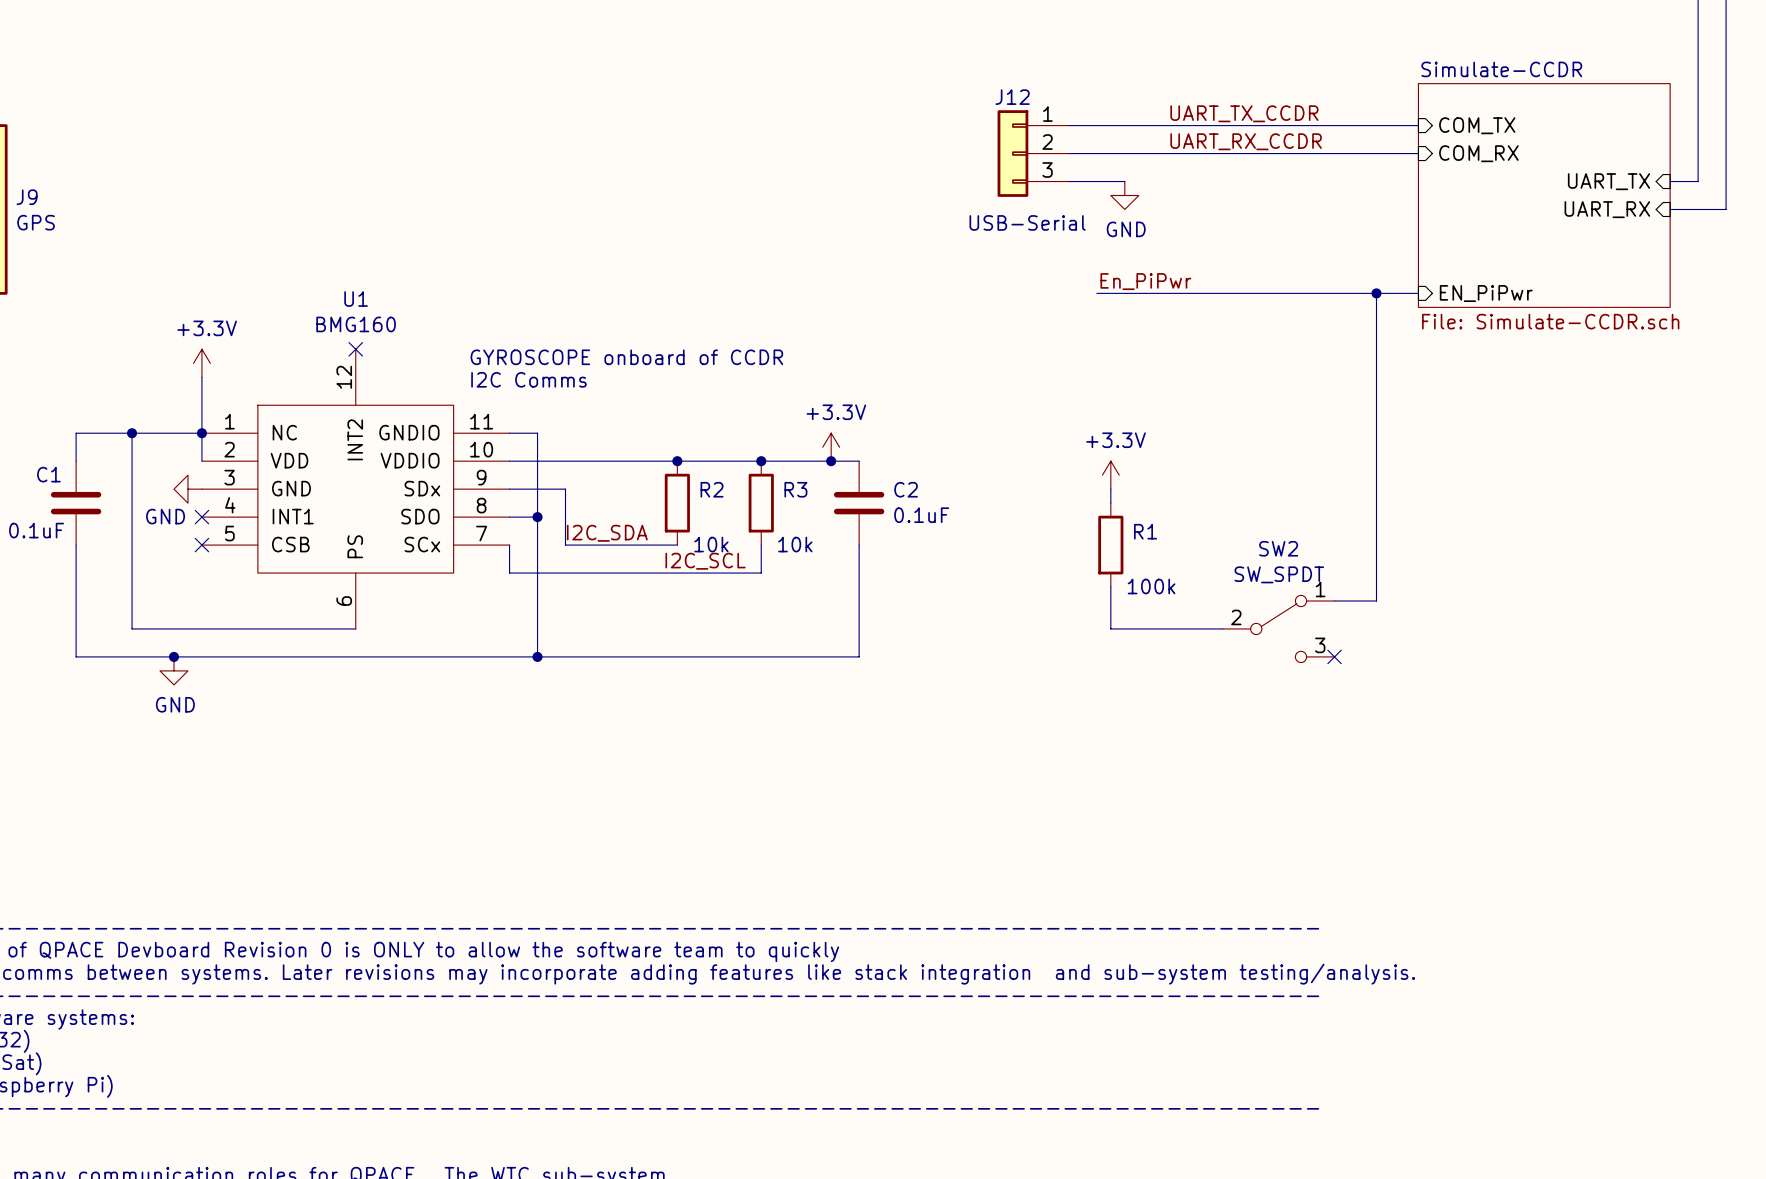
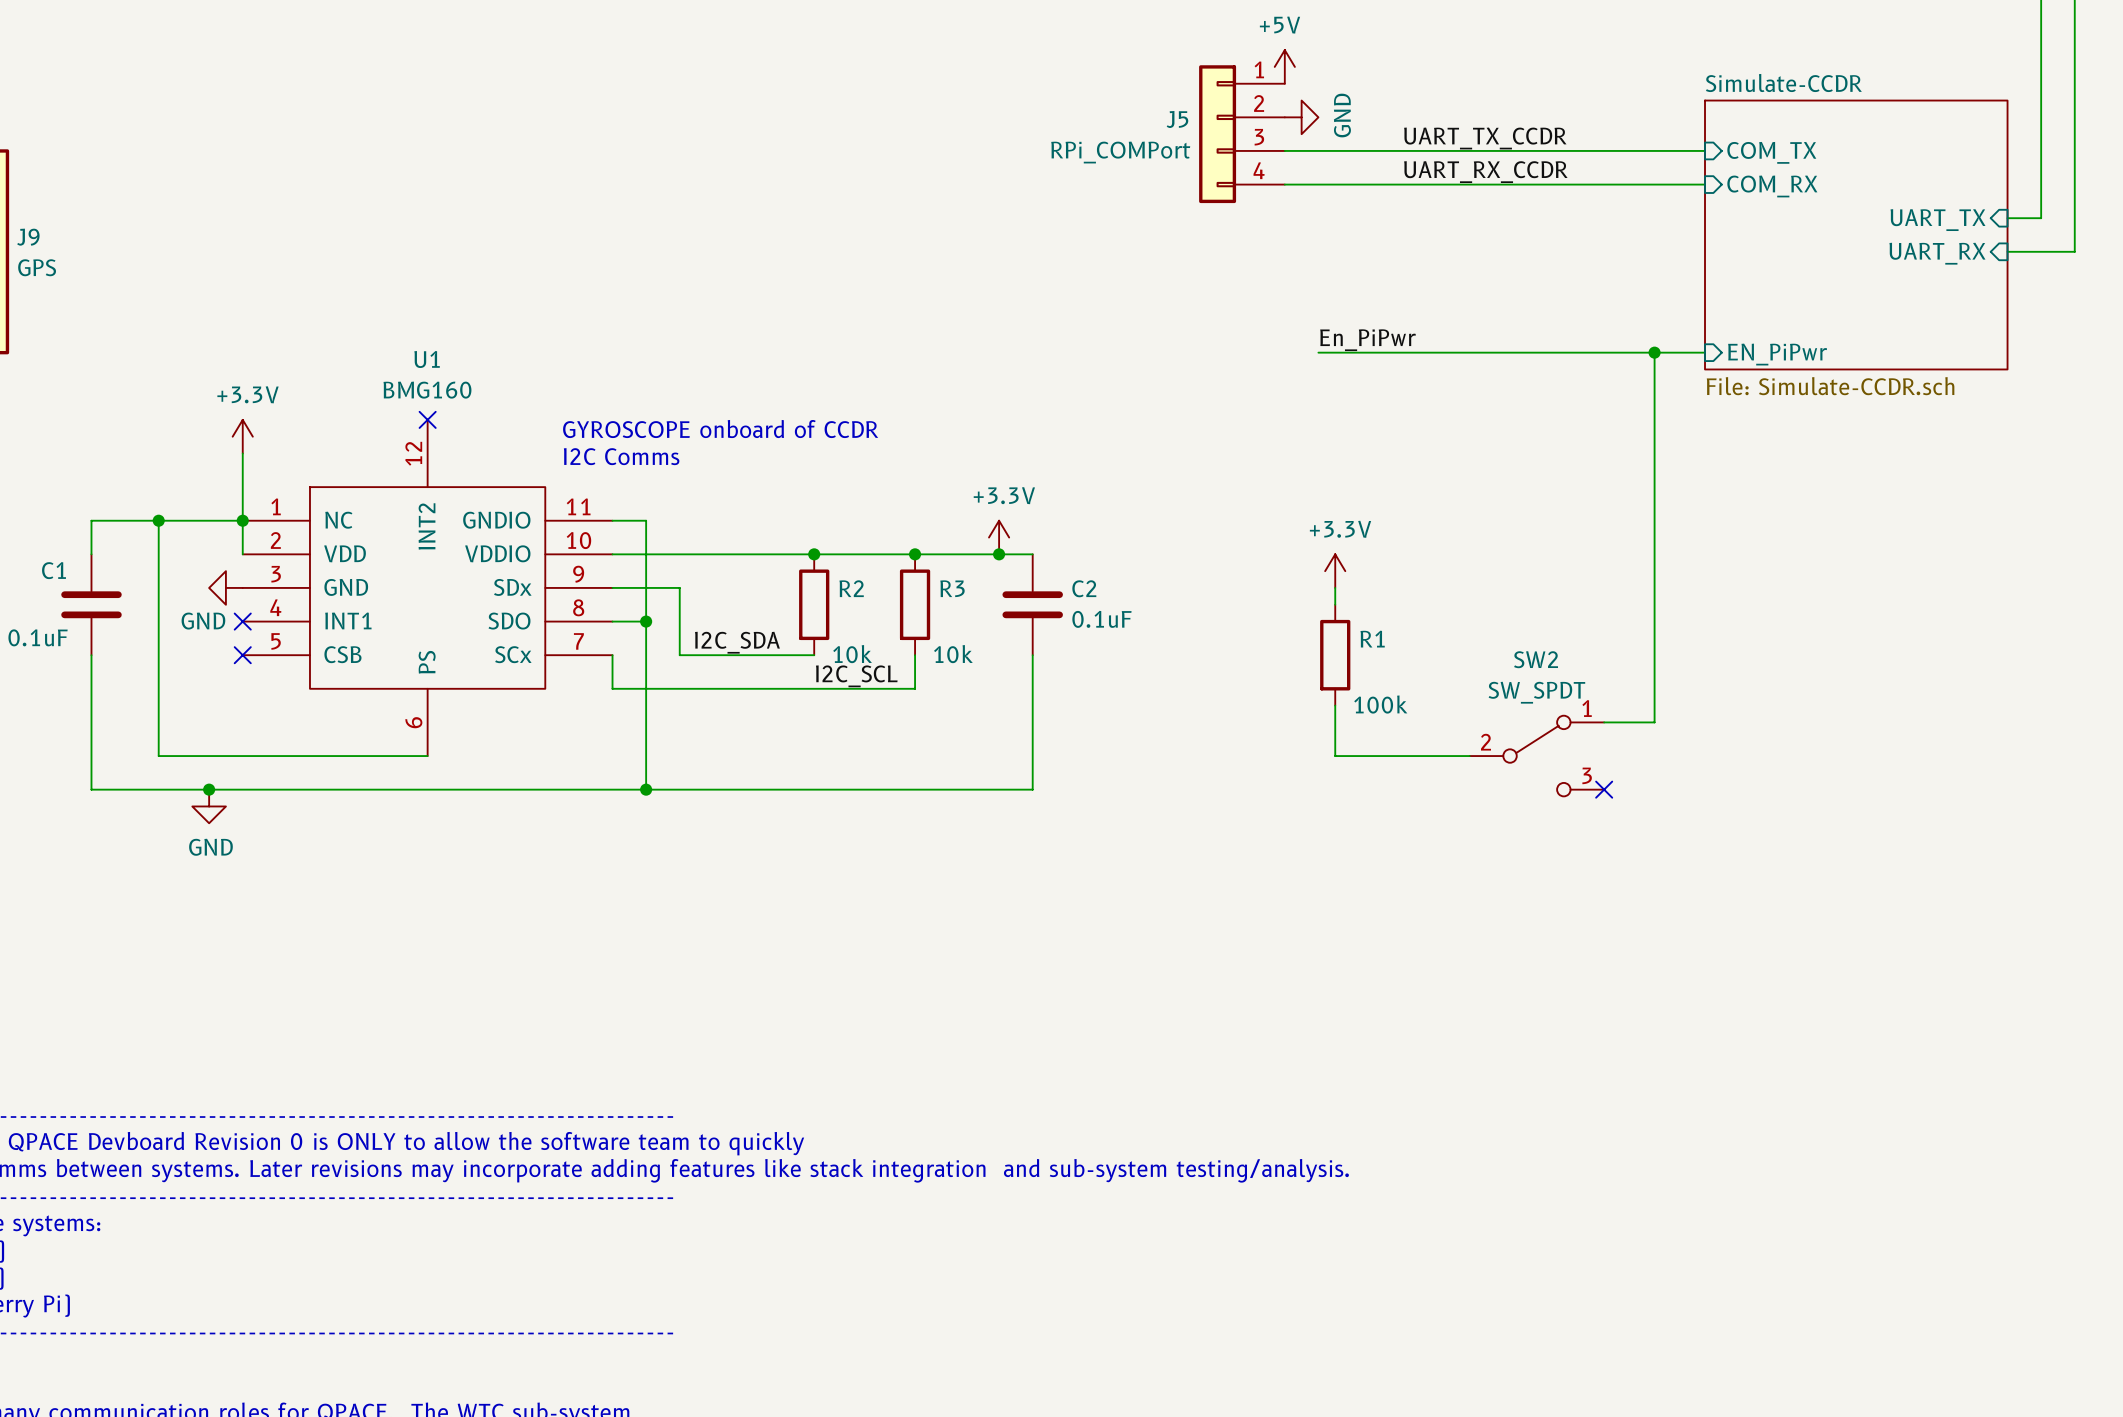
power symbol: none -> +5V (1284, 66)
J5: none -> RPi_COMPort (1241, 134)
J12: USB-Serial (1033, 153) -> none
wire: (1068, 181) (1124, 181) -> none
power symbol rotation: 0° (1124, 195) -> 90° counterclockwise (1301, 117)
power symbol position: GND (1124, 195) -> GND (1301, 117)

